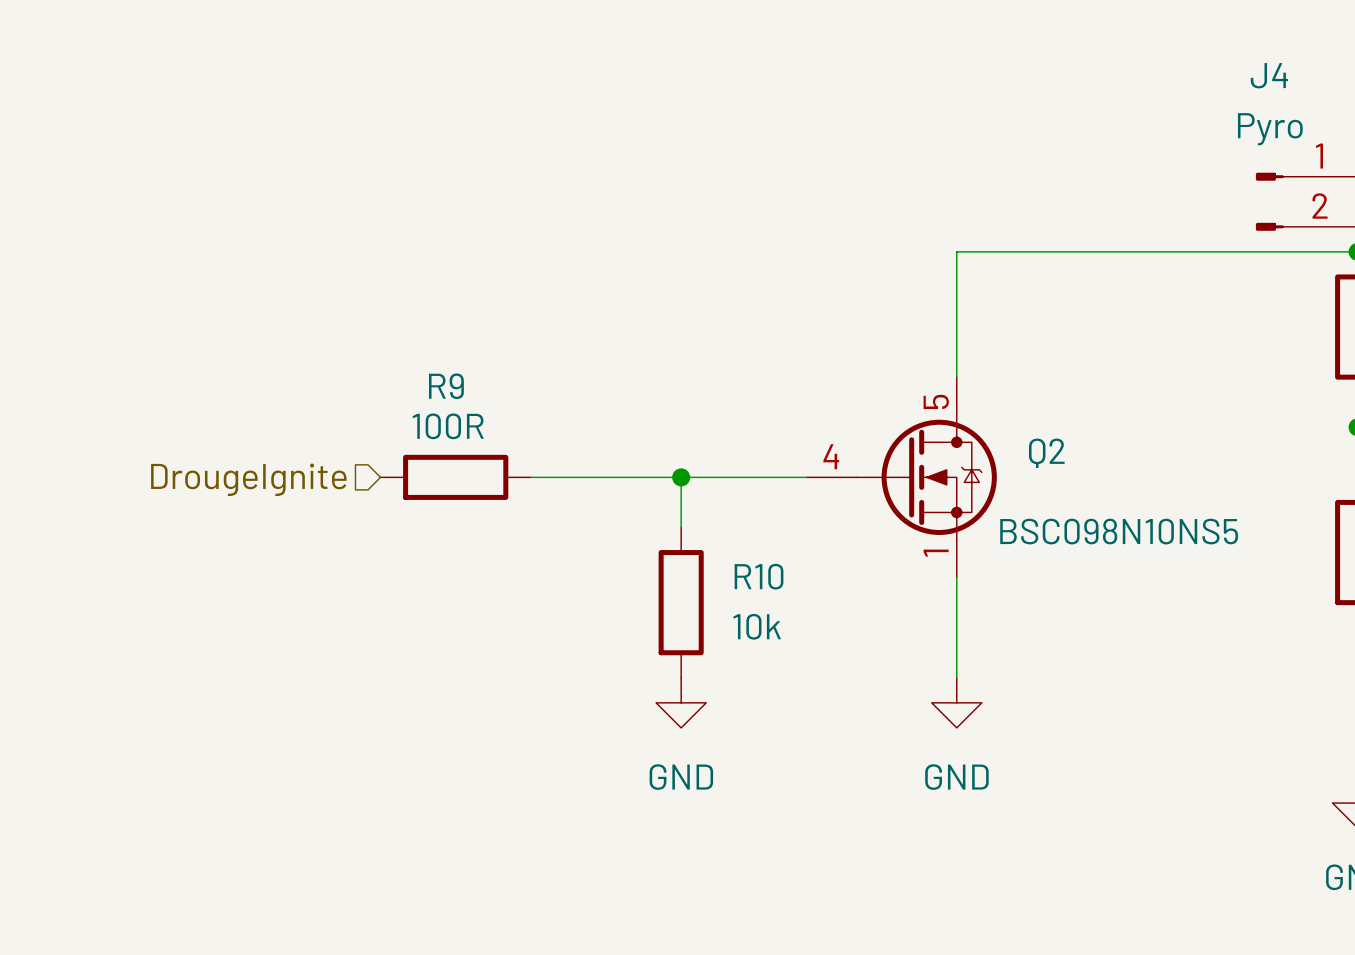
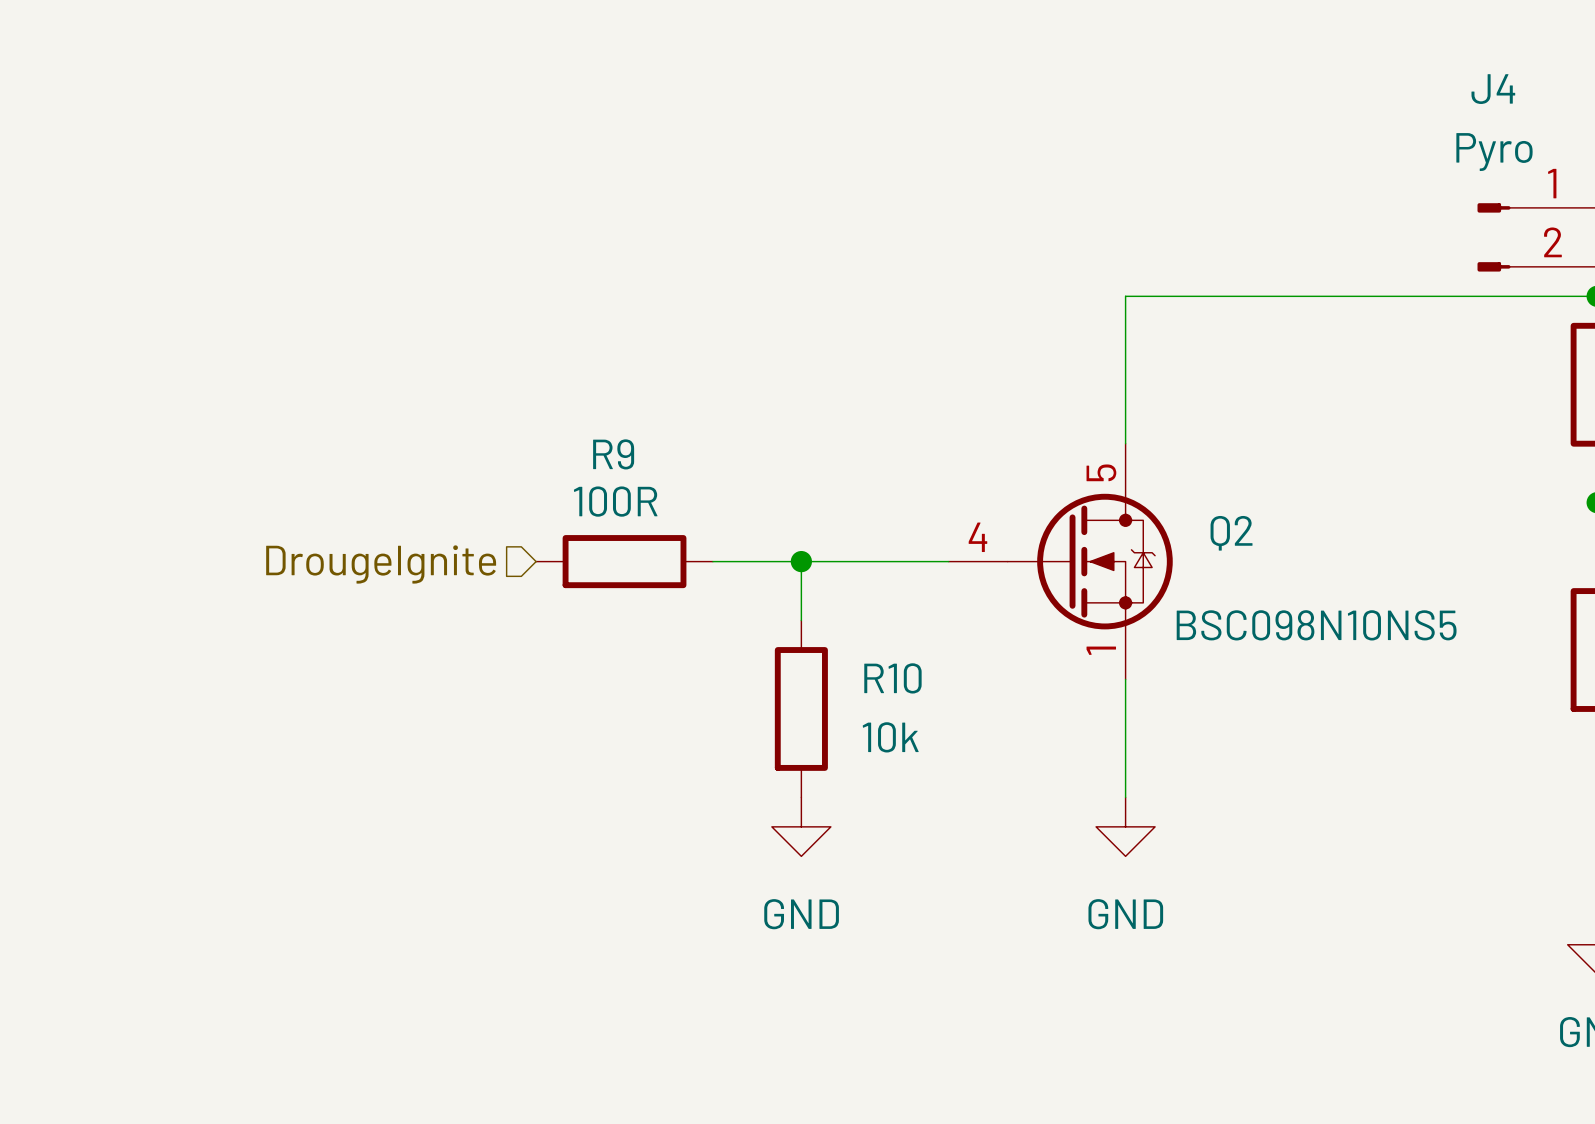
R9 position: (455, 477) -> (624, 561)
wire: (530, 477) (606, 477) -> none
hierarchical label position: DrougeIgnite (248, 479) -> DrougeIgnite (381, 564)

